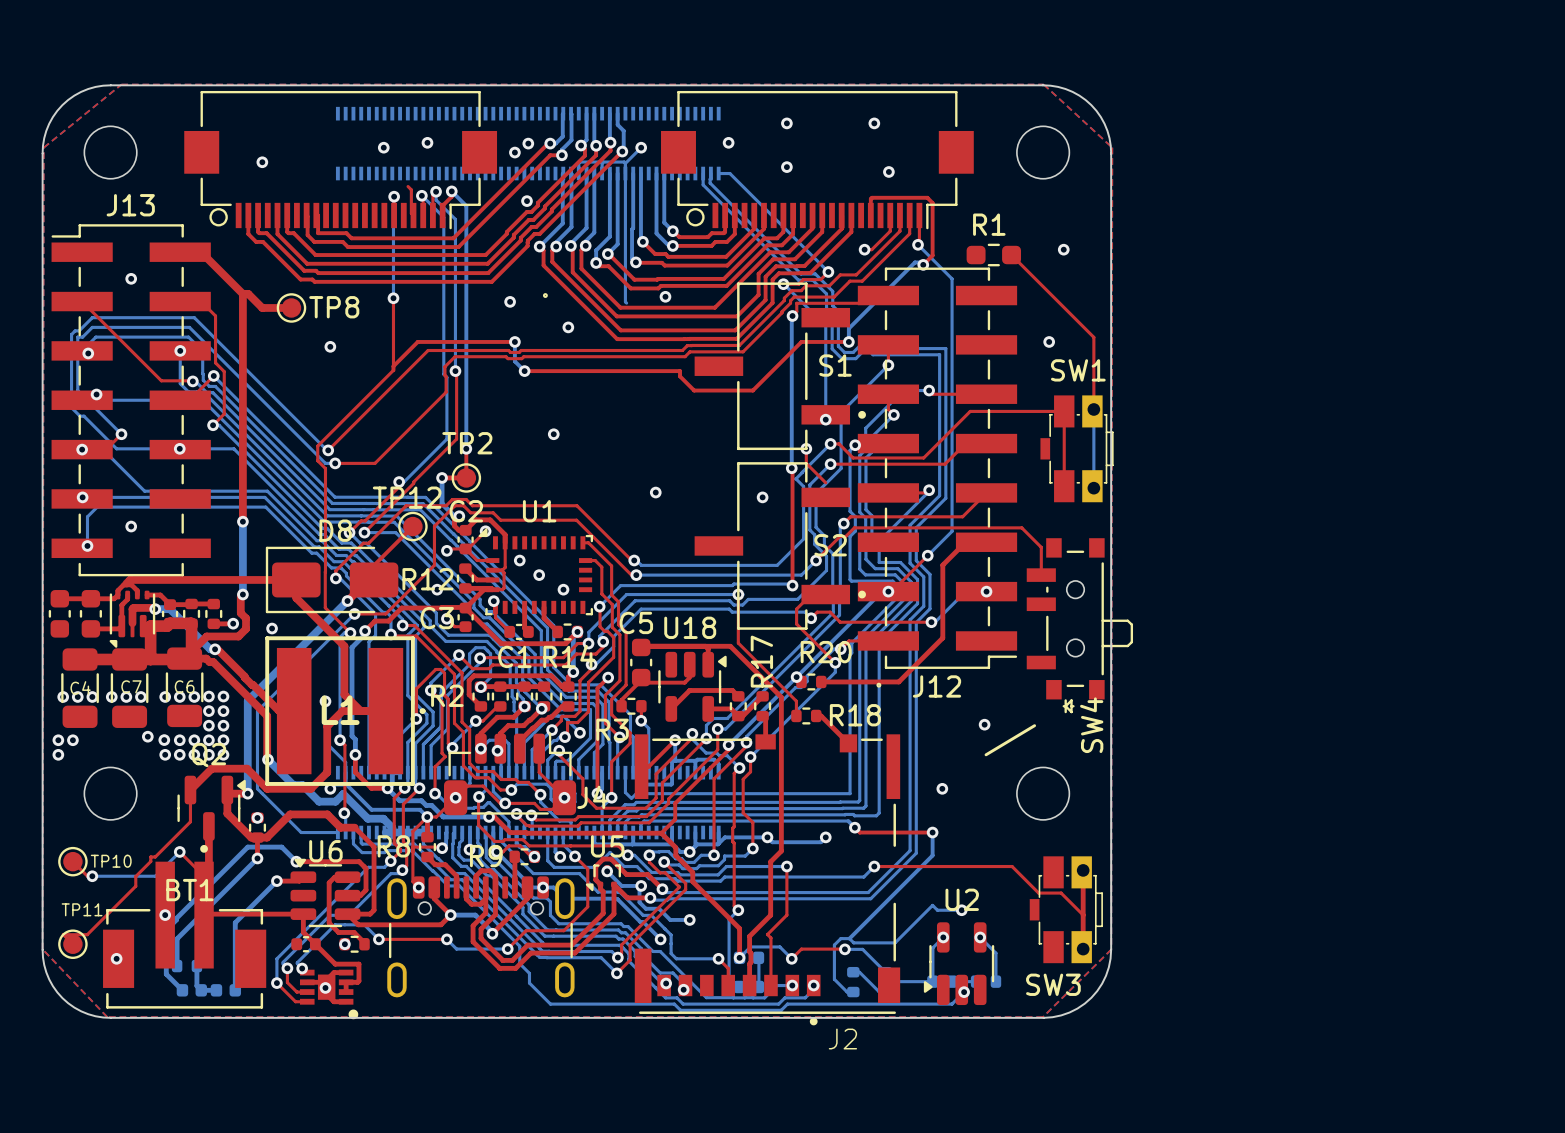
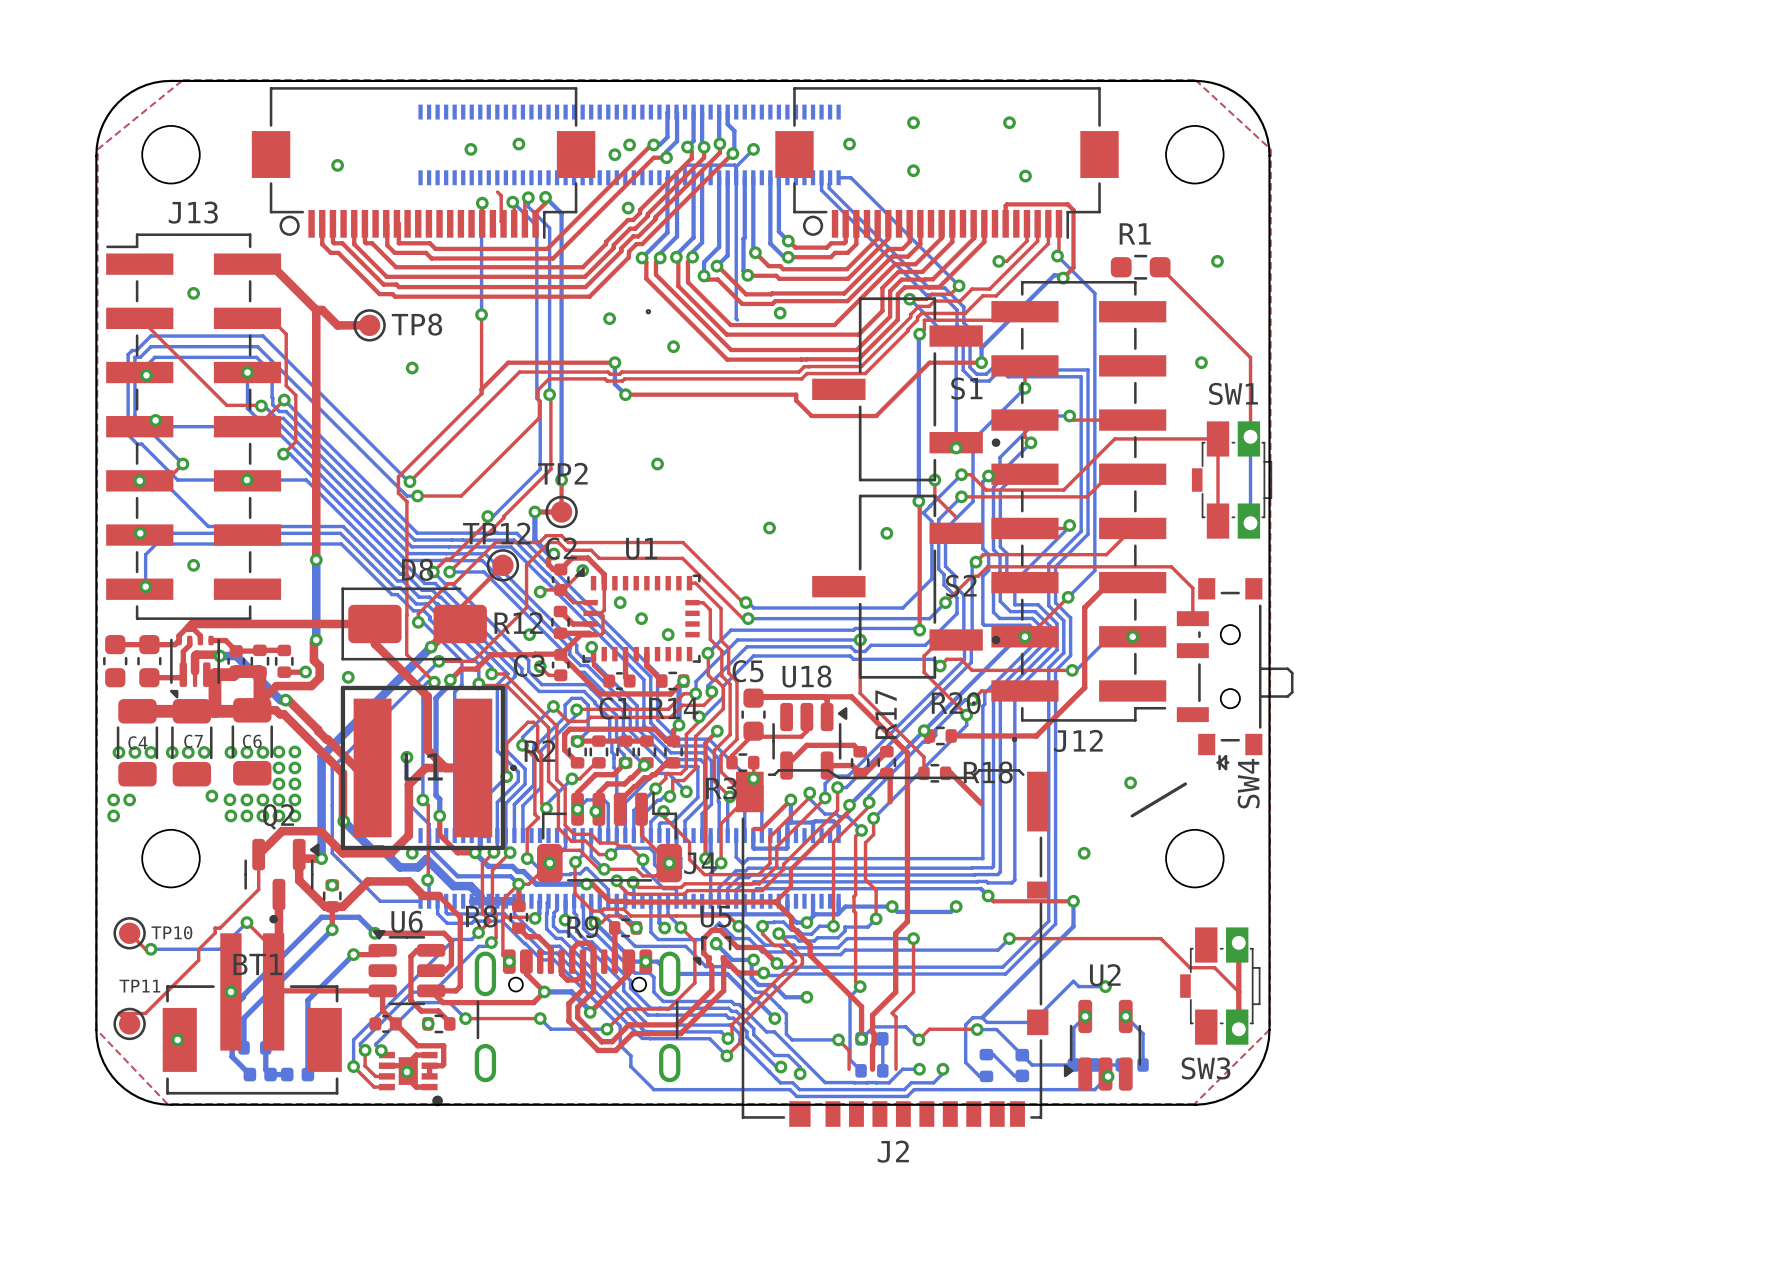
J2 footprint: [634, 734, 901, 1026] -> [735, 769, 1049, 1127]
J2 name position: J2 (842, 1039) -> J2 (893, 1151)

